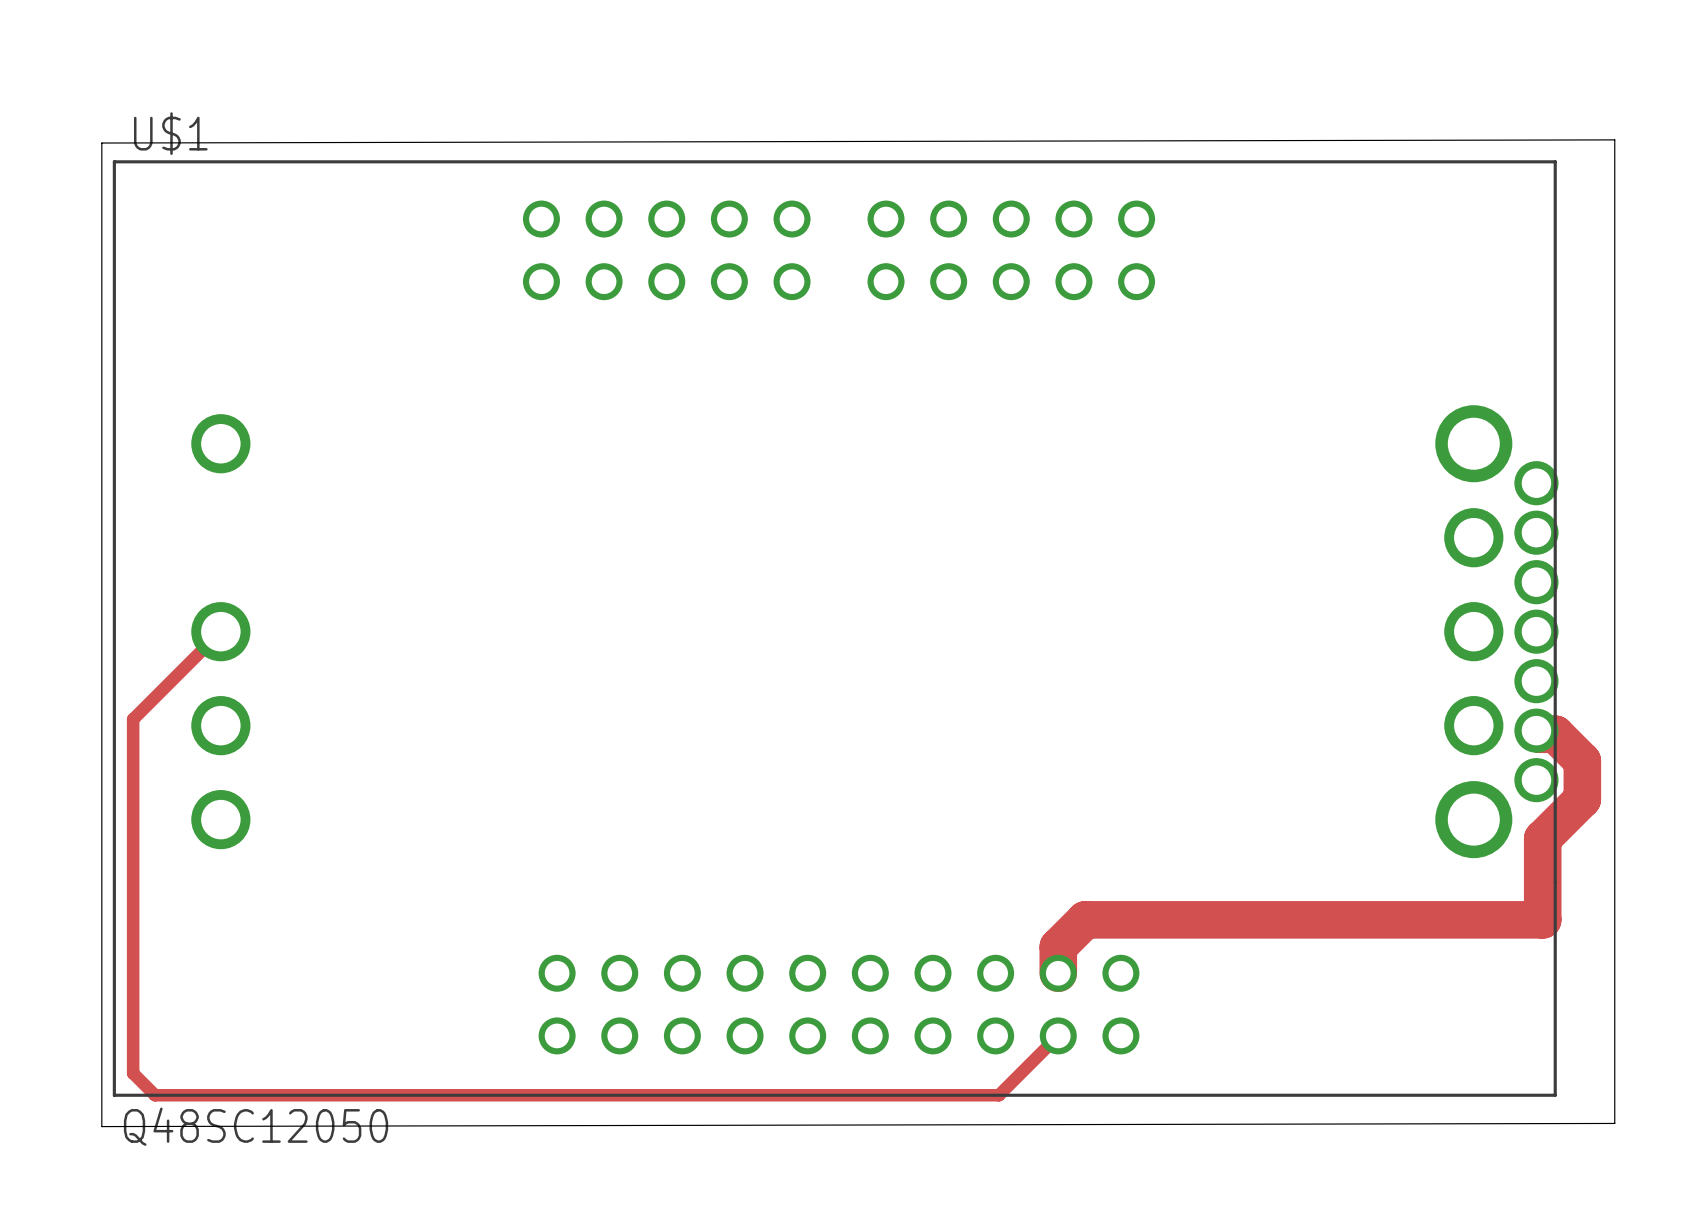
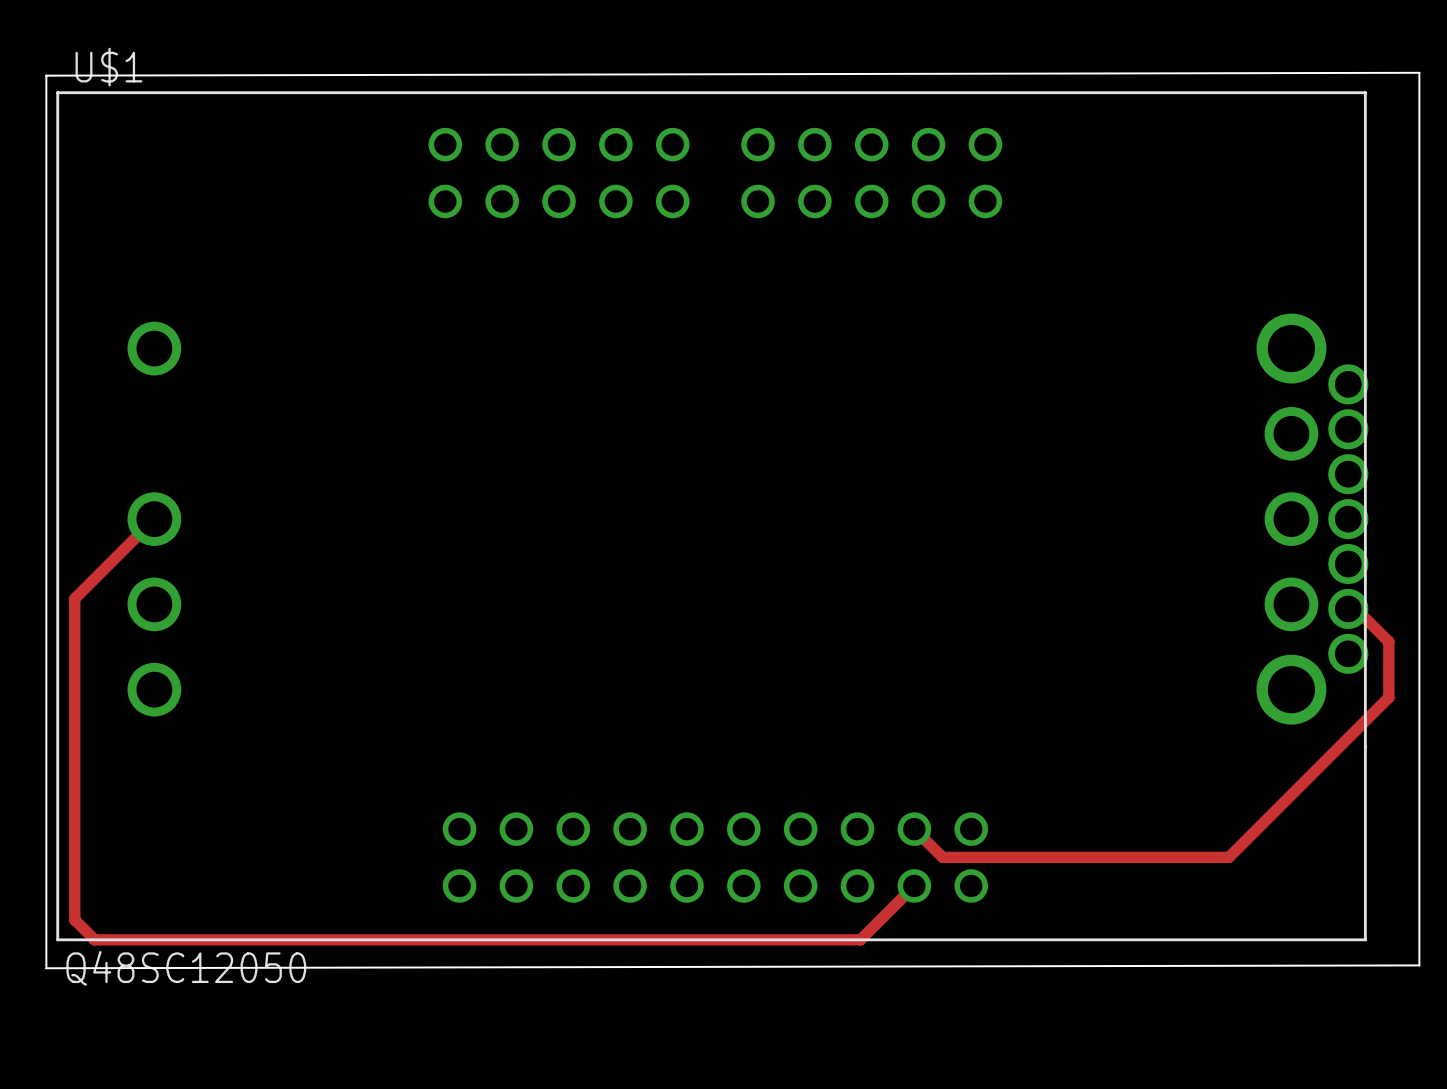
top track: (1536, 730) (1540, 734) (1555, 734) (1582, 761) (1582, 799) (1542, 838) (1542, 919) (1085, 919) (1058, 946) (1058, 973) -> (1348, 608) (1355, 608) (1388, 641) (1388, 697) (1228, 857) (942, 857) (914, 829)

